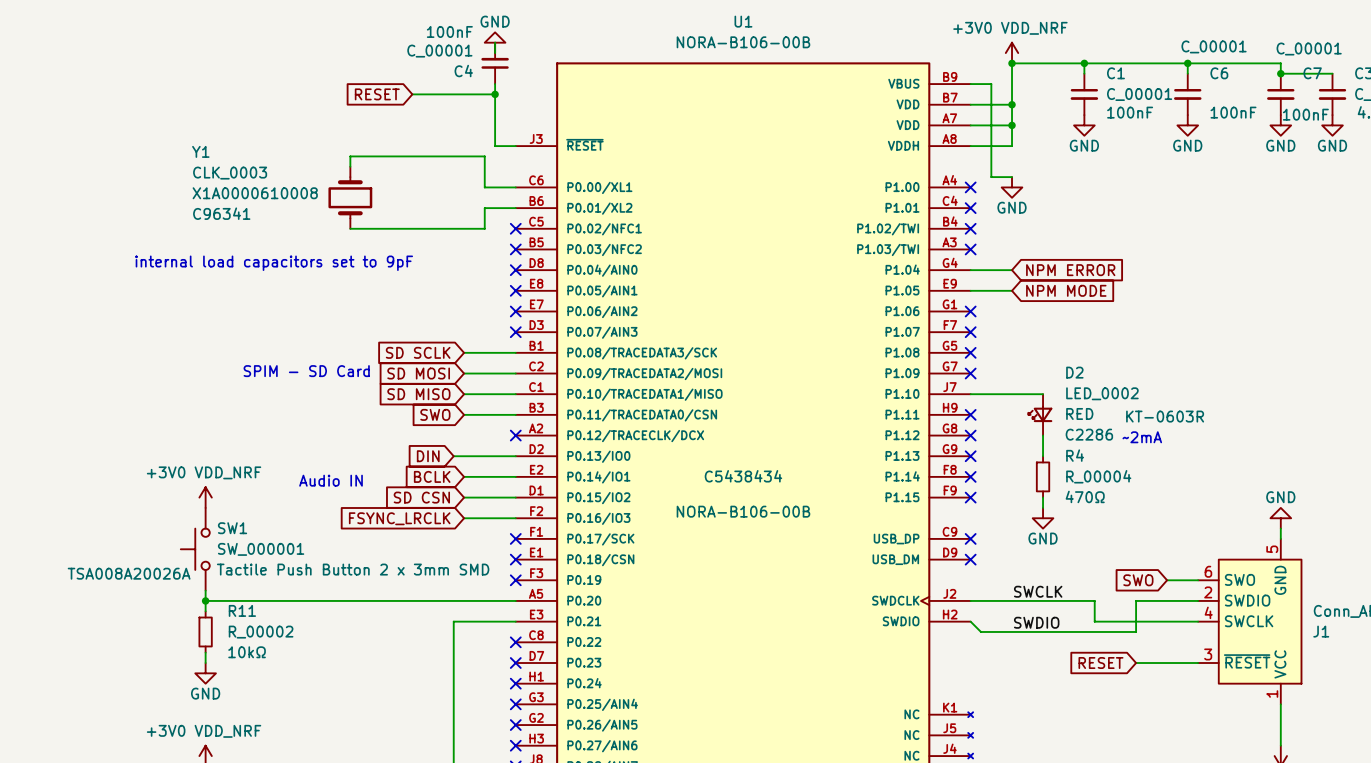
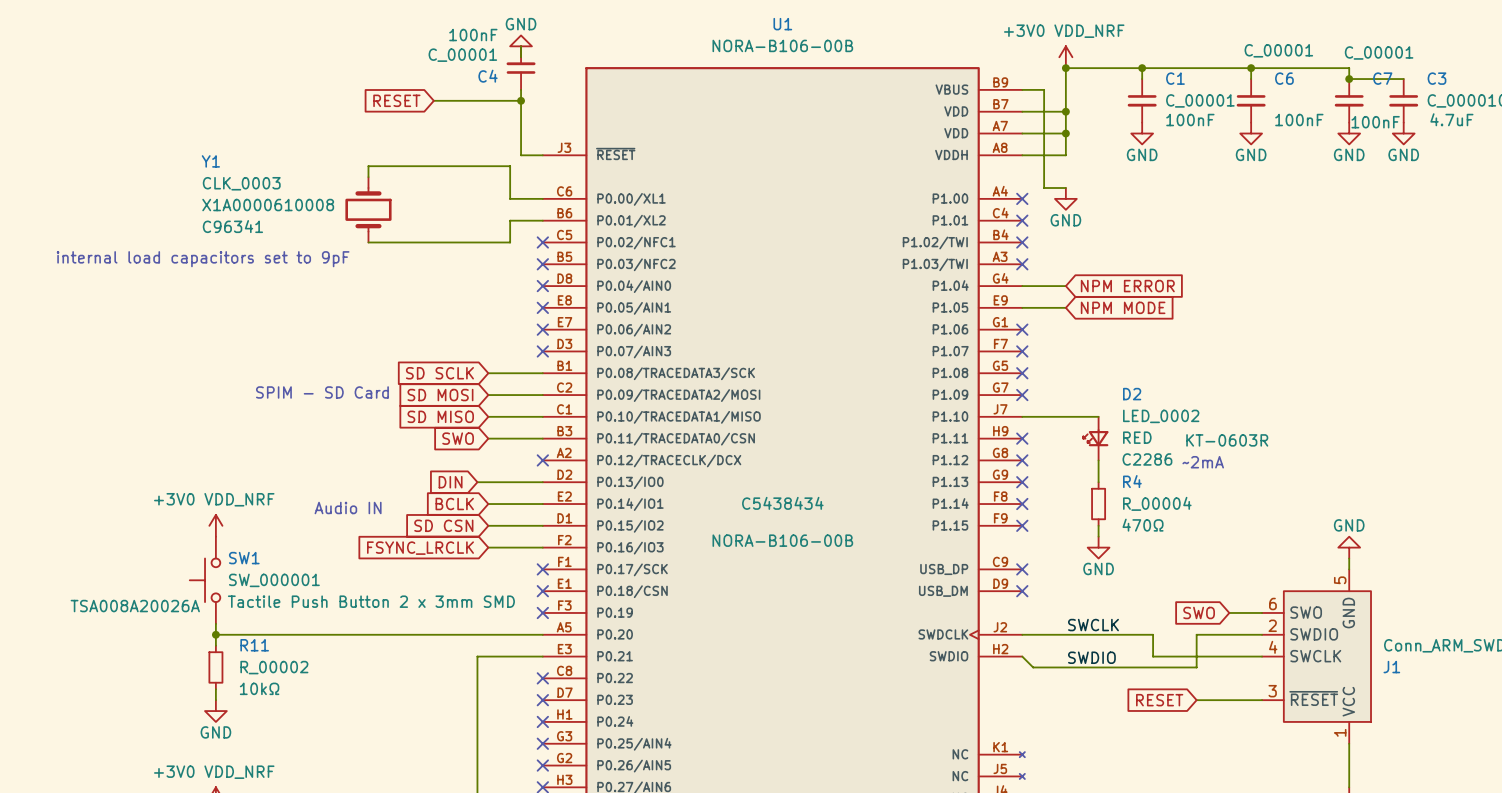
text position: internal load capacitors set to 9pF (274, 263) -> internal load capacitors set to 9pF (203, 259)

